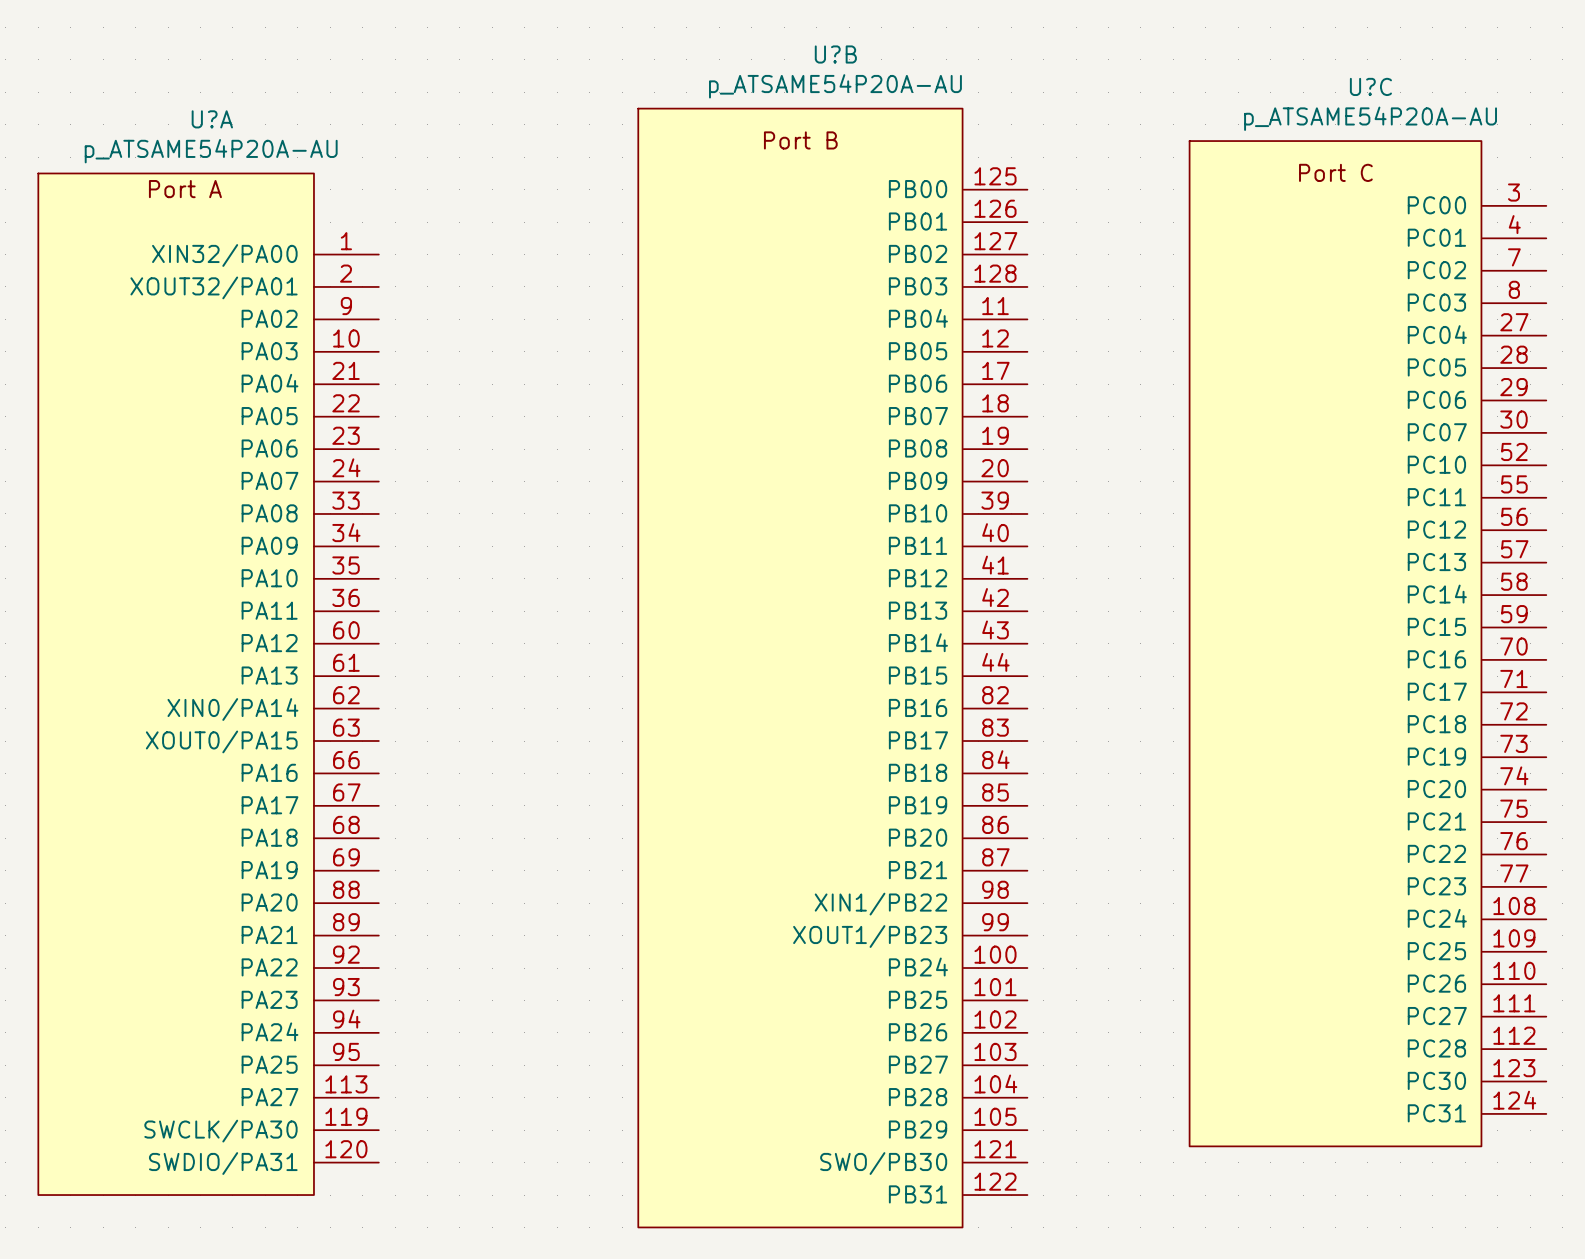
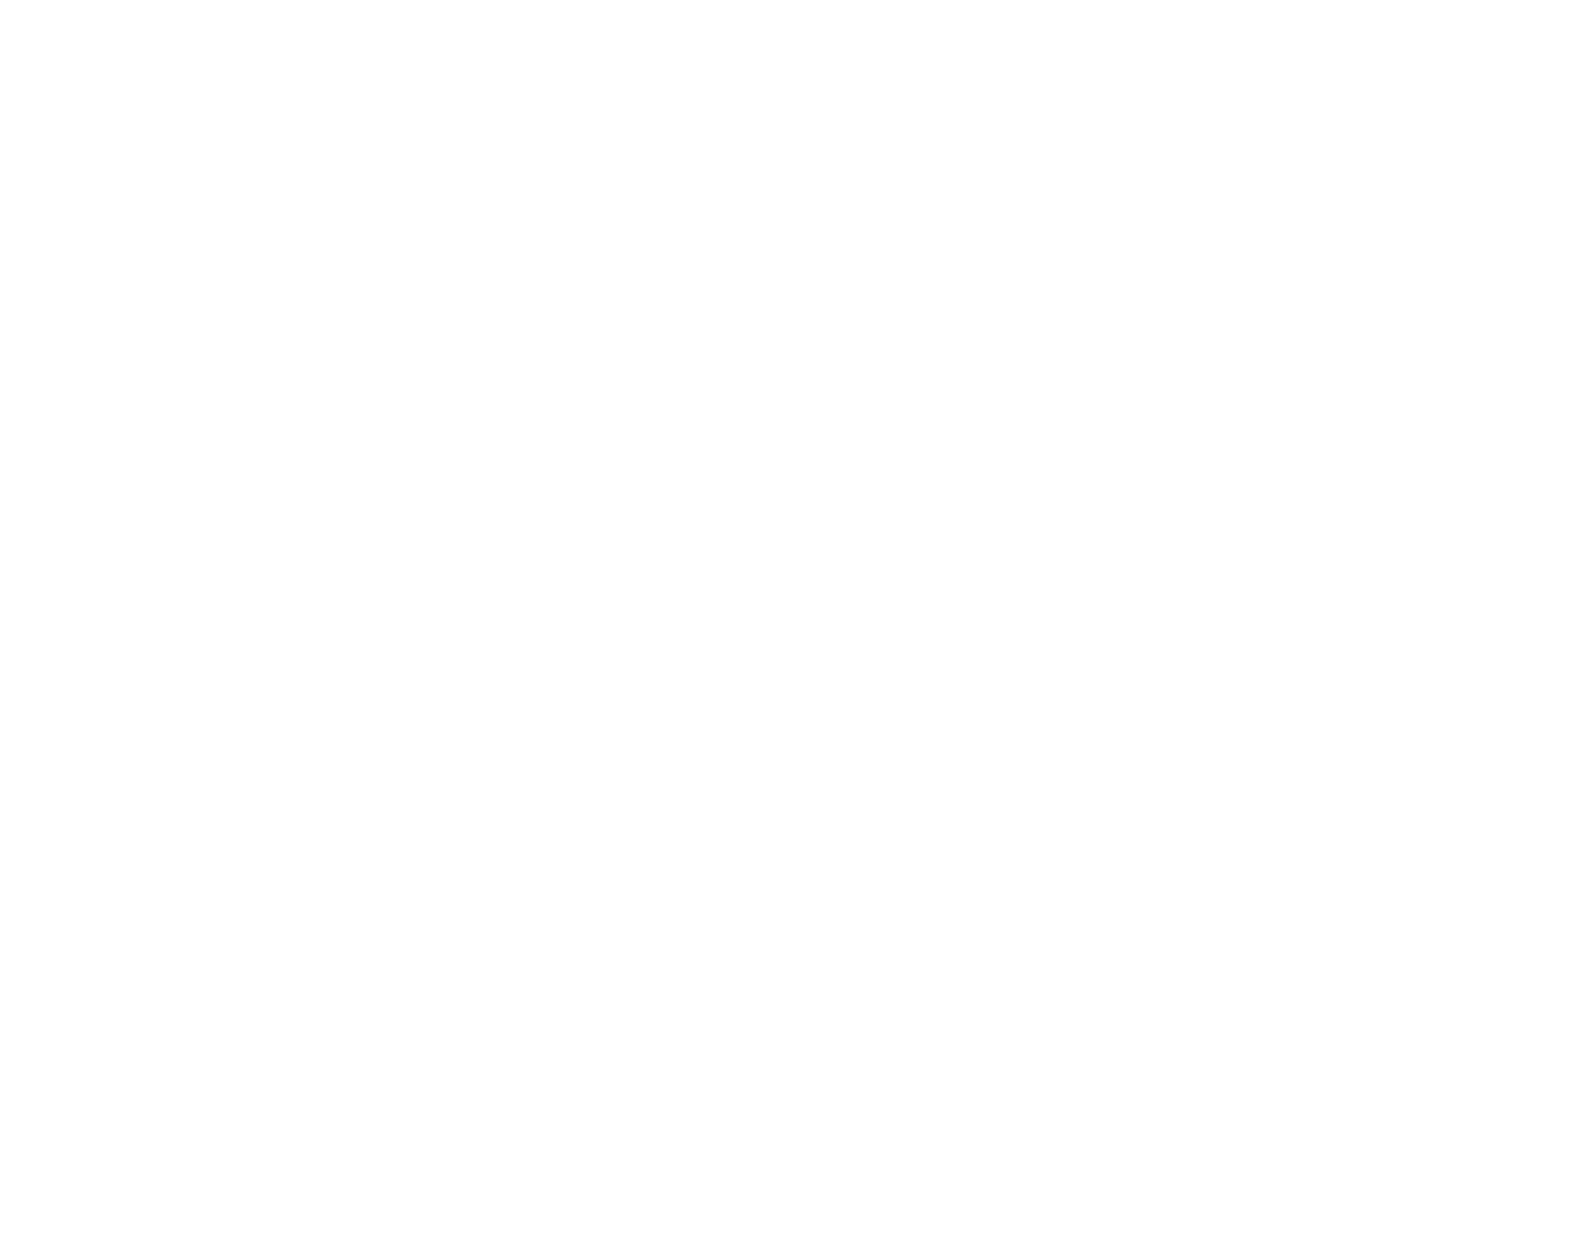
U?C: p_ATSAME54P20A-AU (1367, 643) -> none
U?B: p_ATSAME54P20A-AU (832, 668) -> none
U?A: p_ATSAME54P20A-AU (208, 684) -> none

